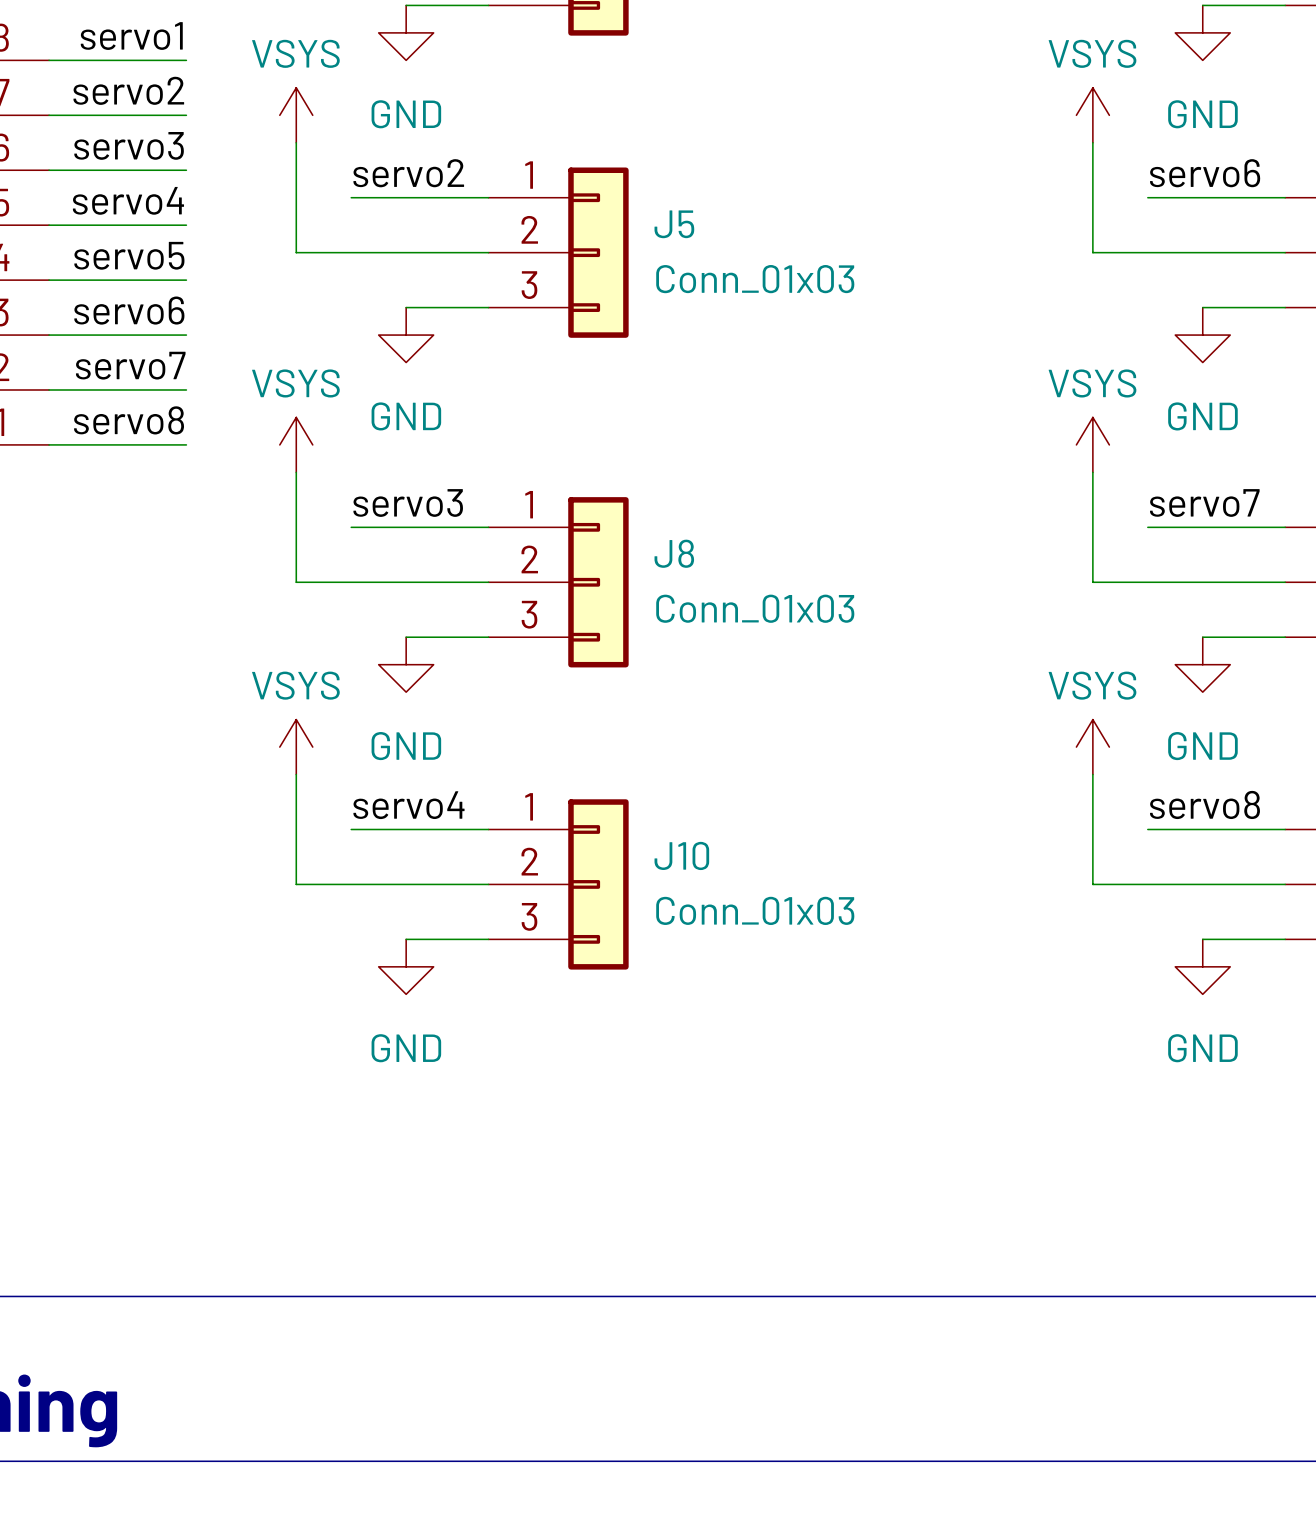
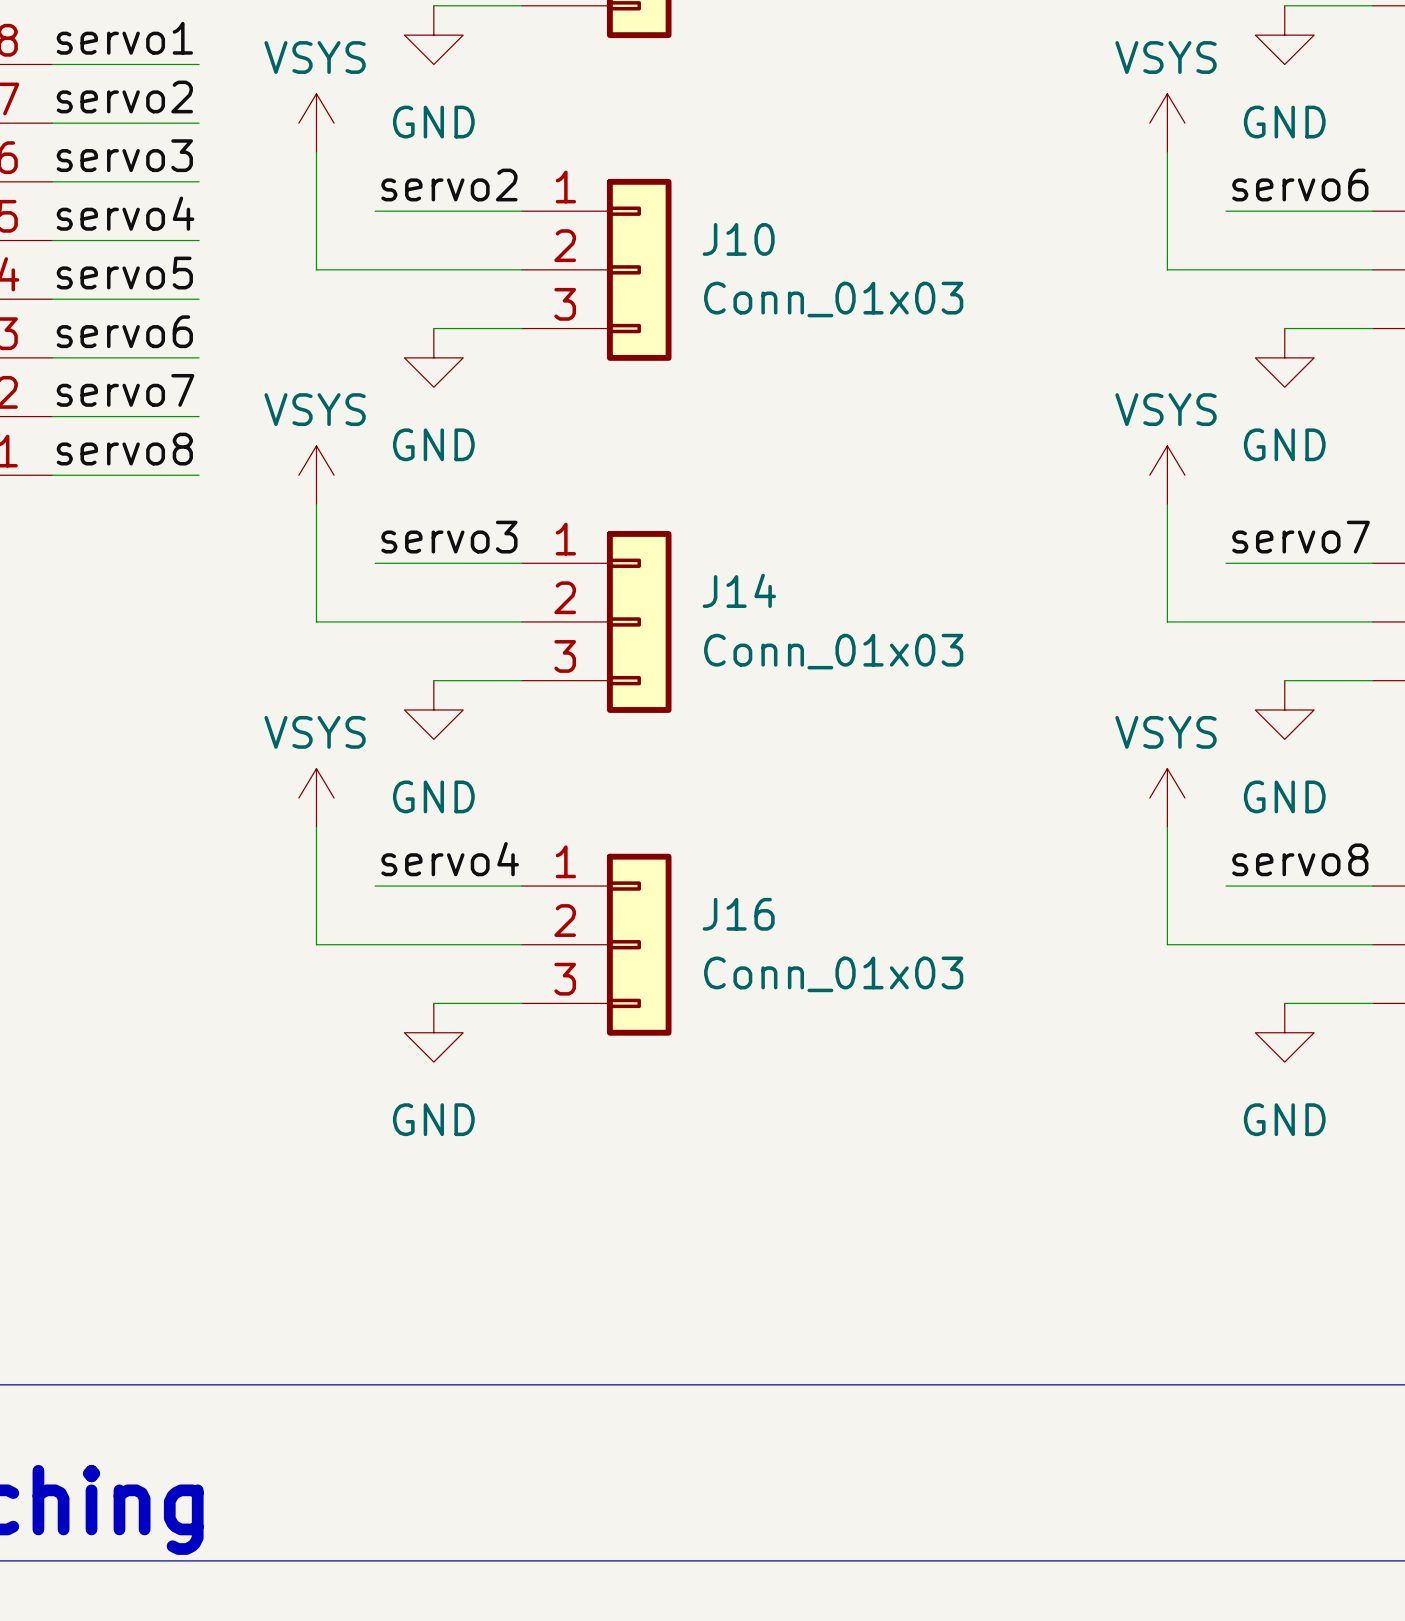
J5 name: J5 (674, 224) -> J10 (738, 239)
J8 name: J8 (674, 553) -> J14 (739, 590)
J10 name: J10 (681, 855) -> J16 (738, 914)

